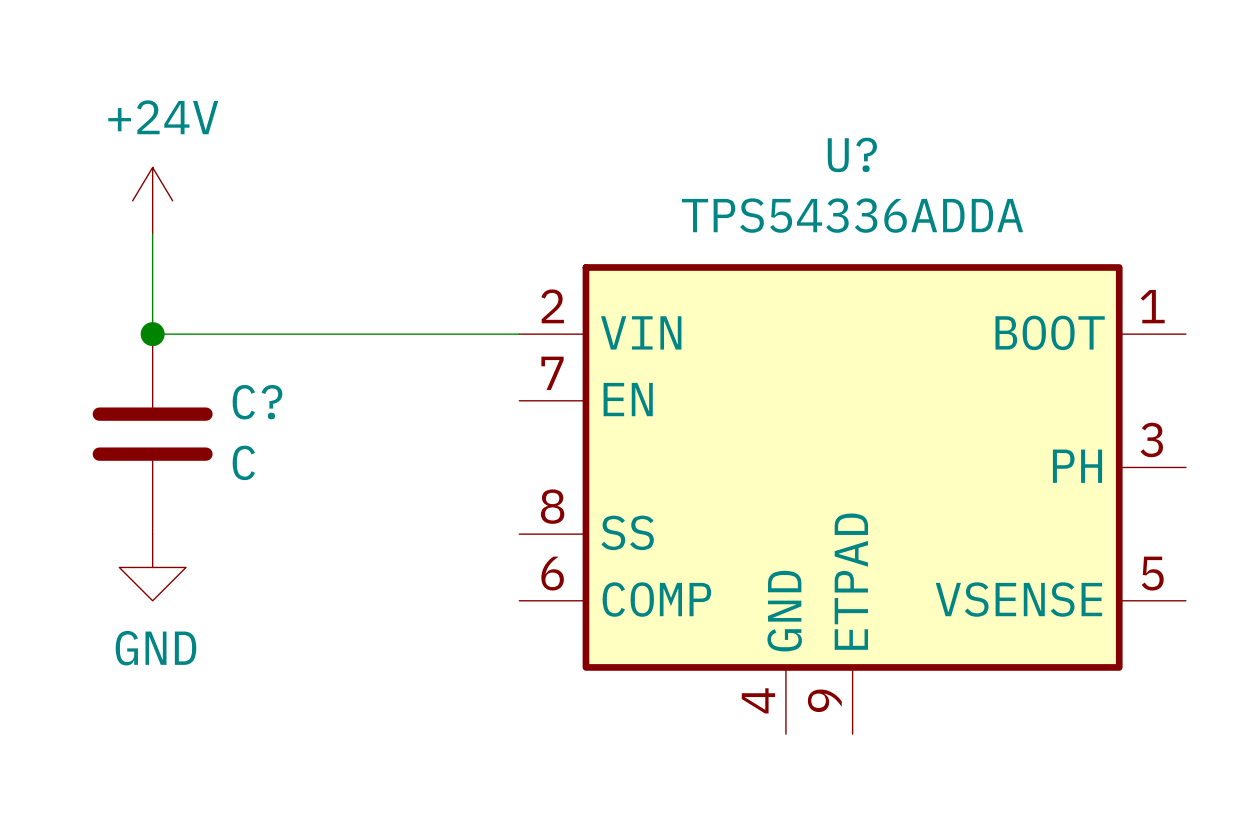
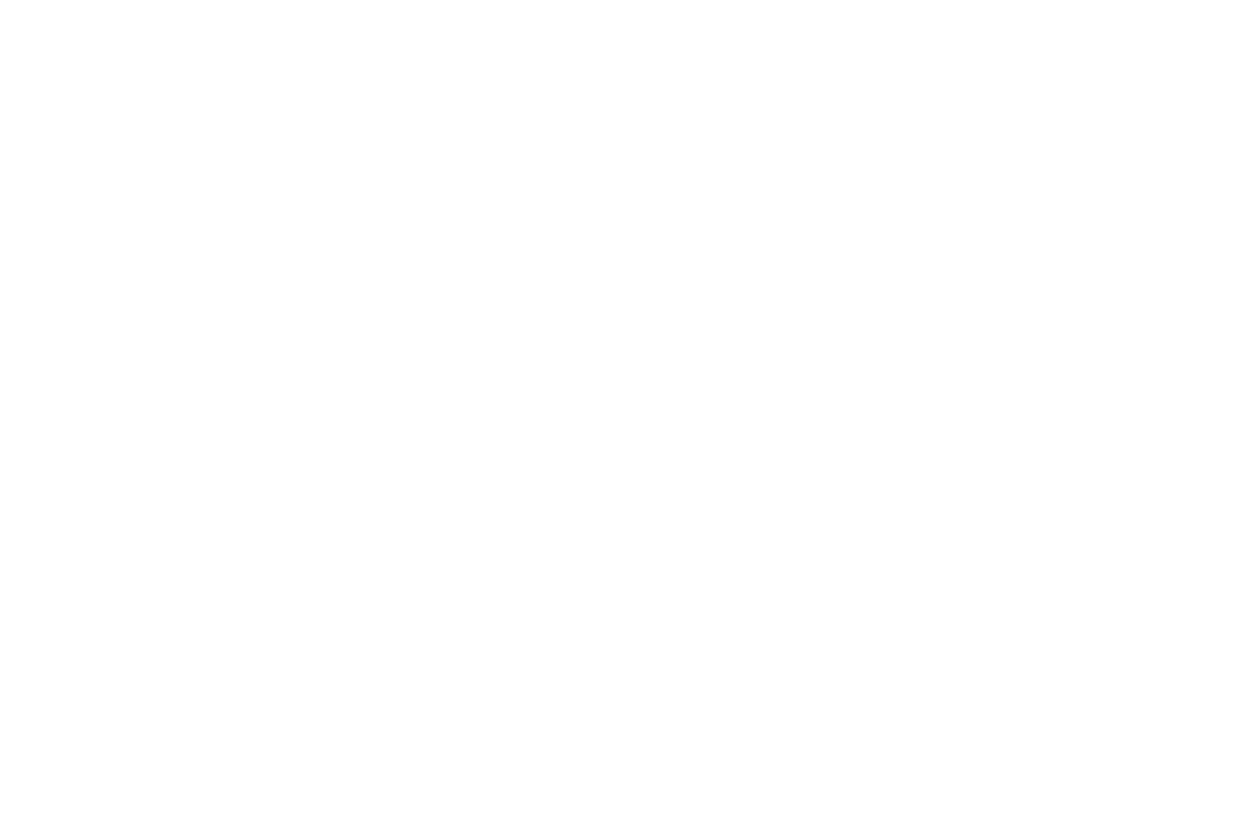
power symbol: +24V (152, 200) -> none
wire: (152, 234) (152, 334) (519, 334) -> none
junction: (152, 334) -> none
C?: C (152, 434) -> none
U?: TPS54336ADDA (852, 499) -> none
power symbol: GND (152, 567) -> none

